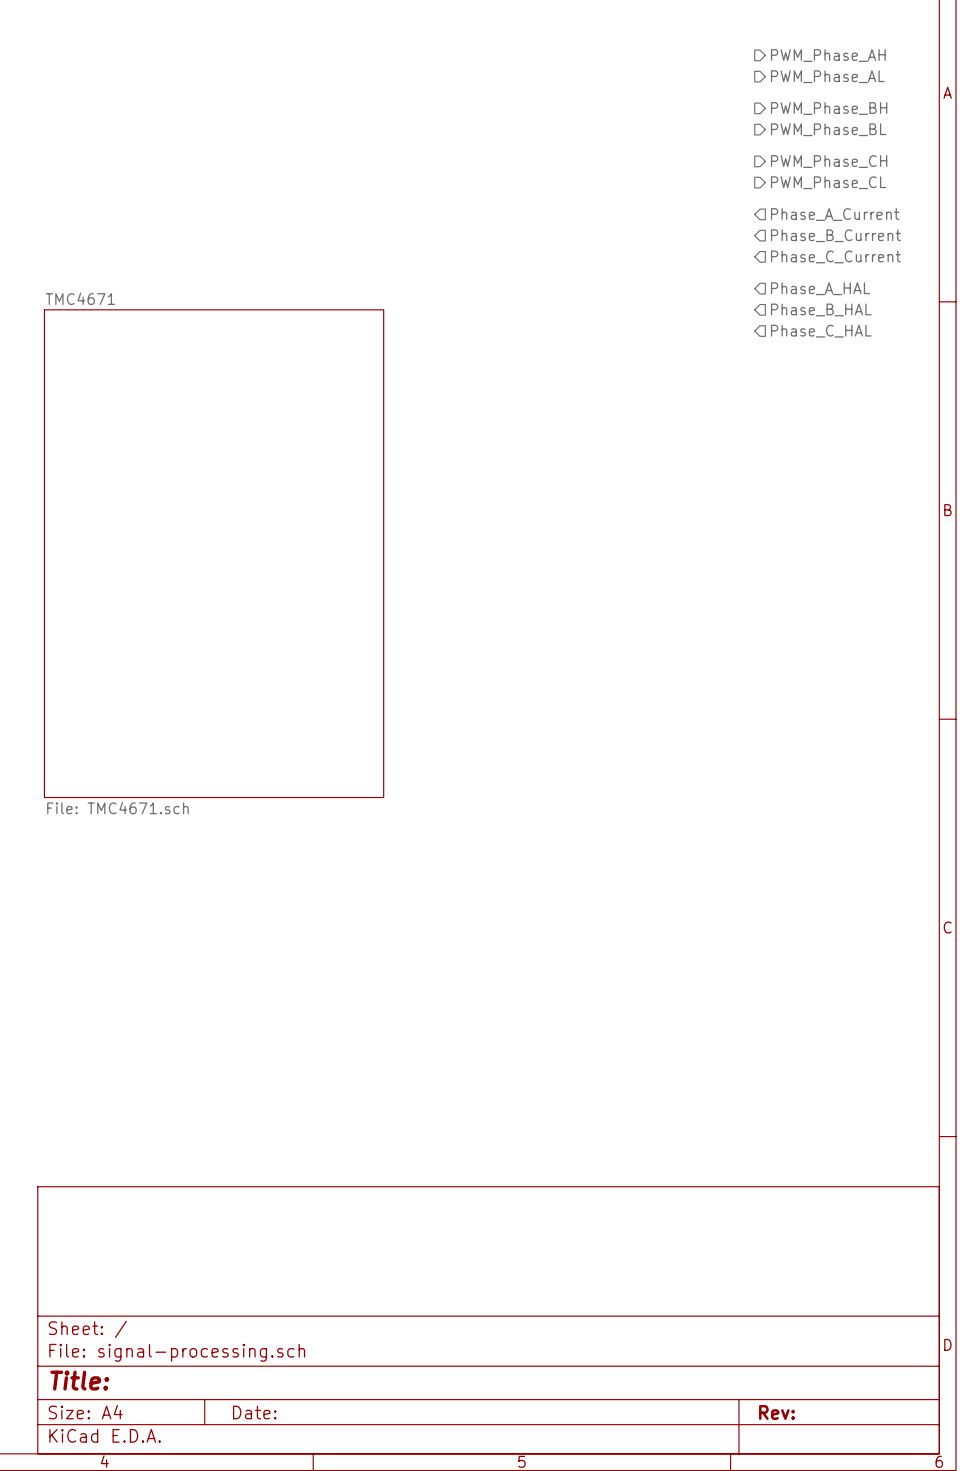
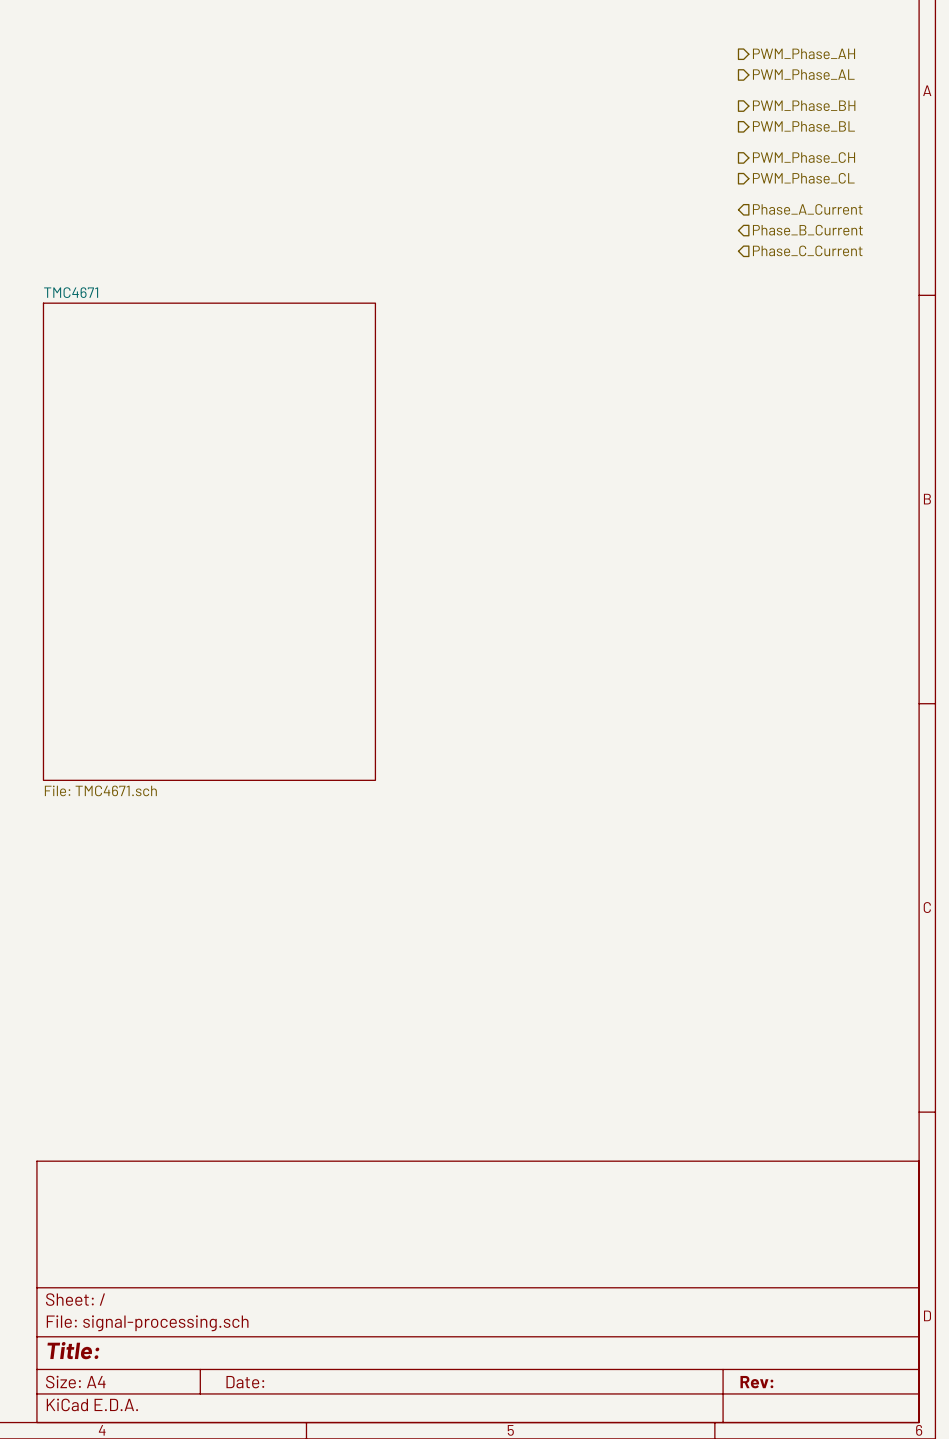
hierarchical label: Phase_A_HAL (820, 288) -> none
hierarchical label: Phase_B_HAL (821, 309) -> none
hierarchical label: Phase_C_HAL (821, 331) -> none

